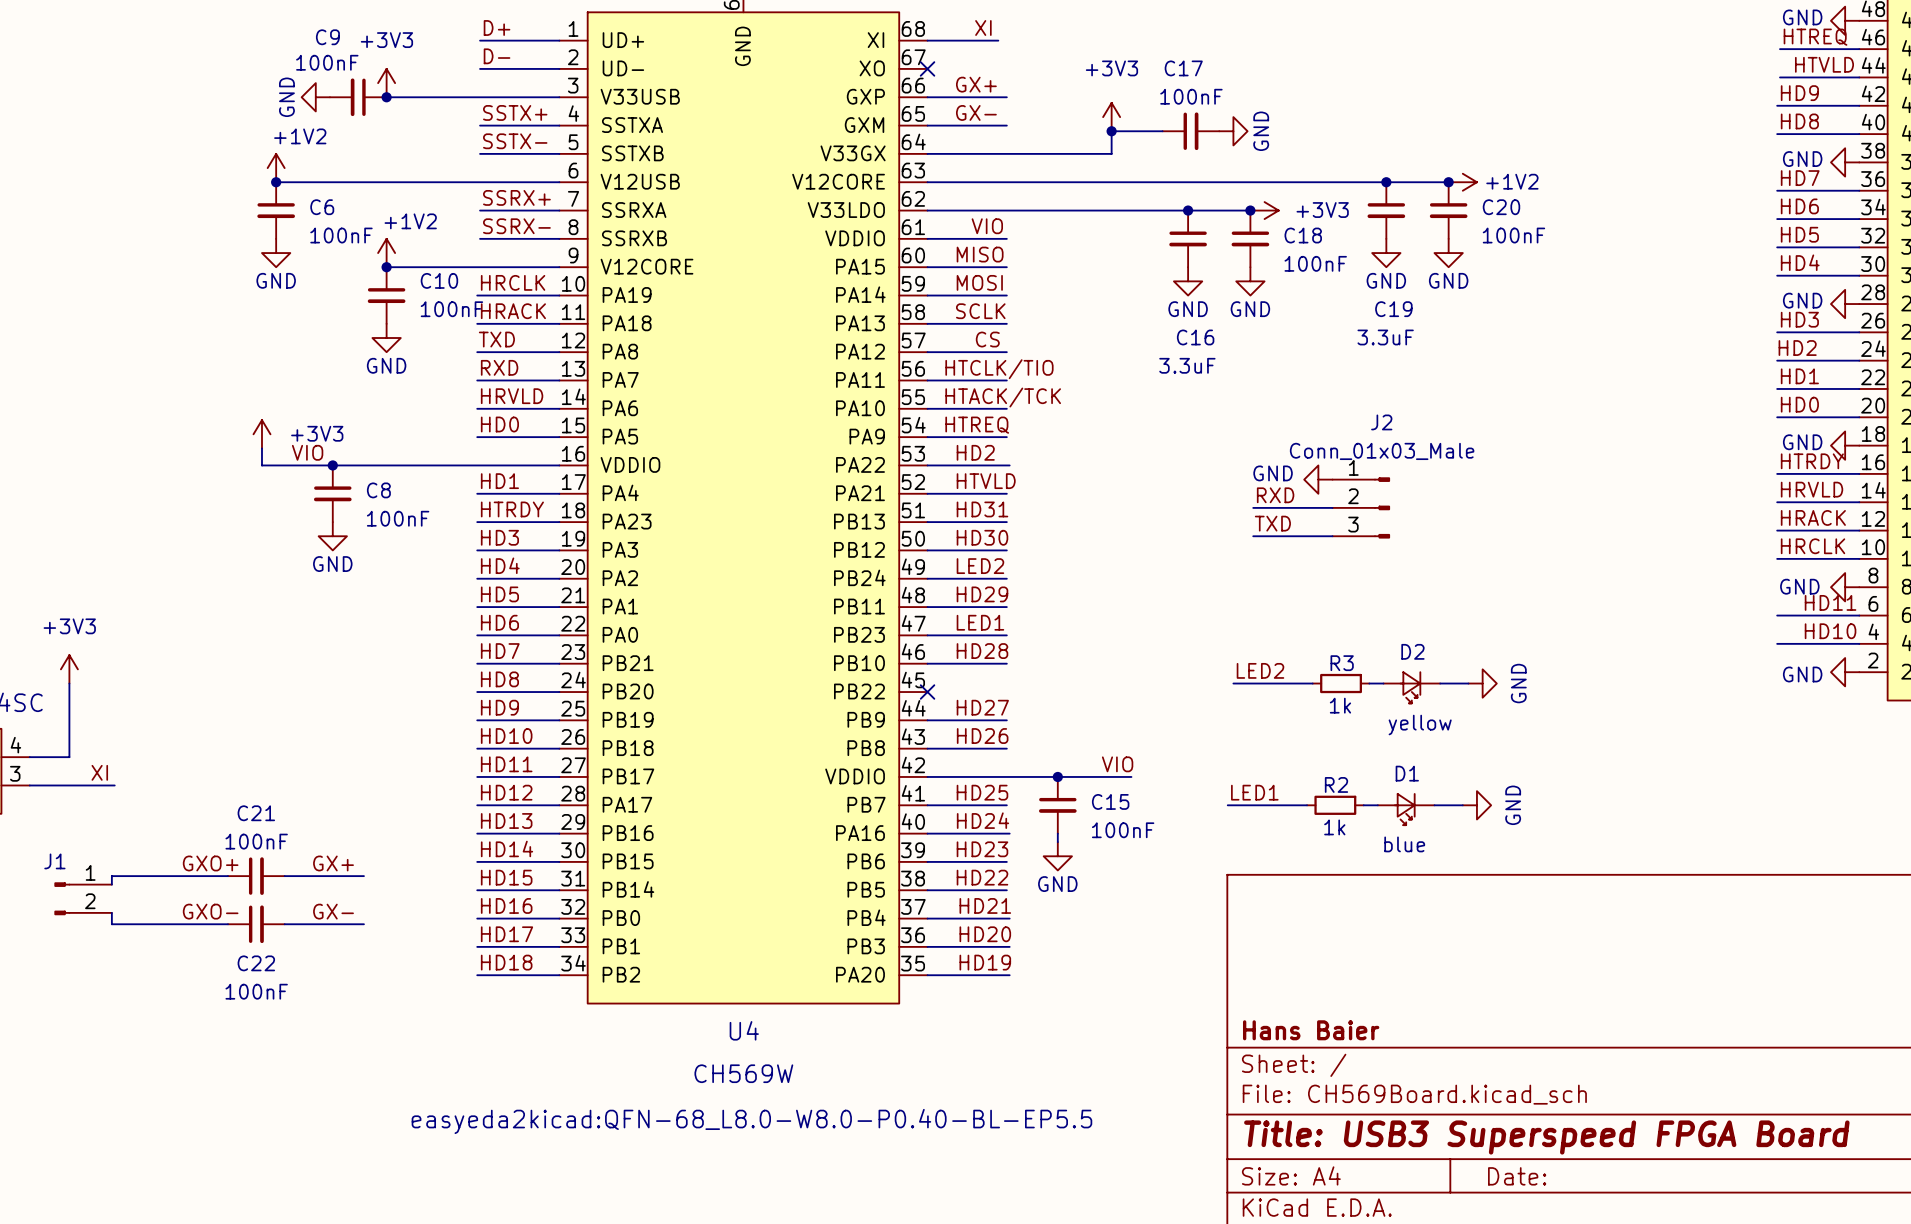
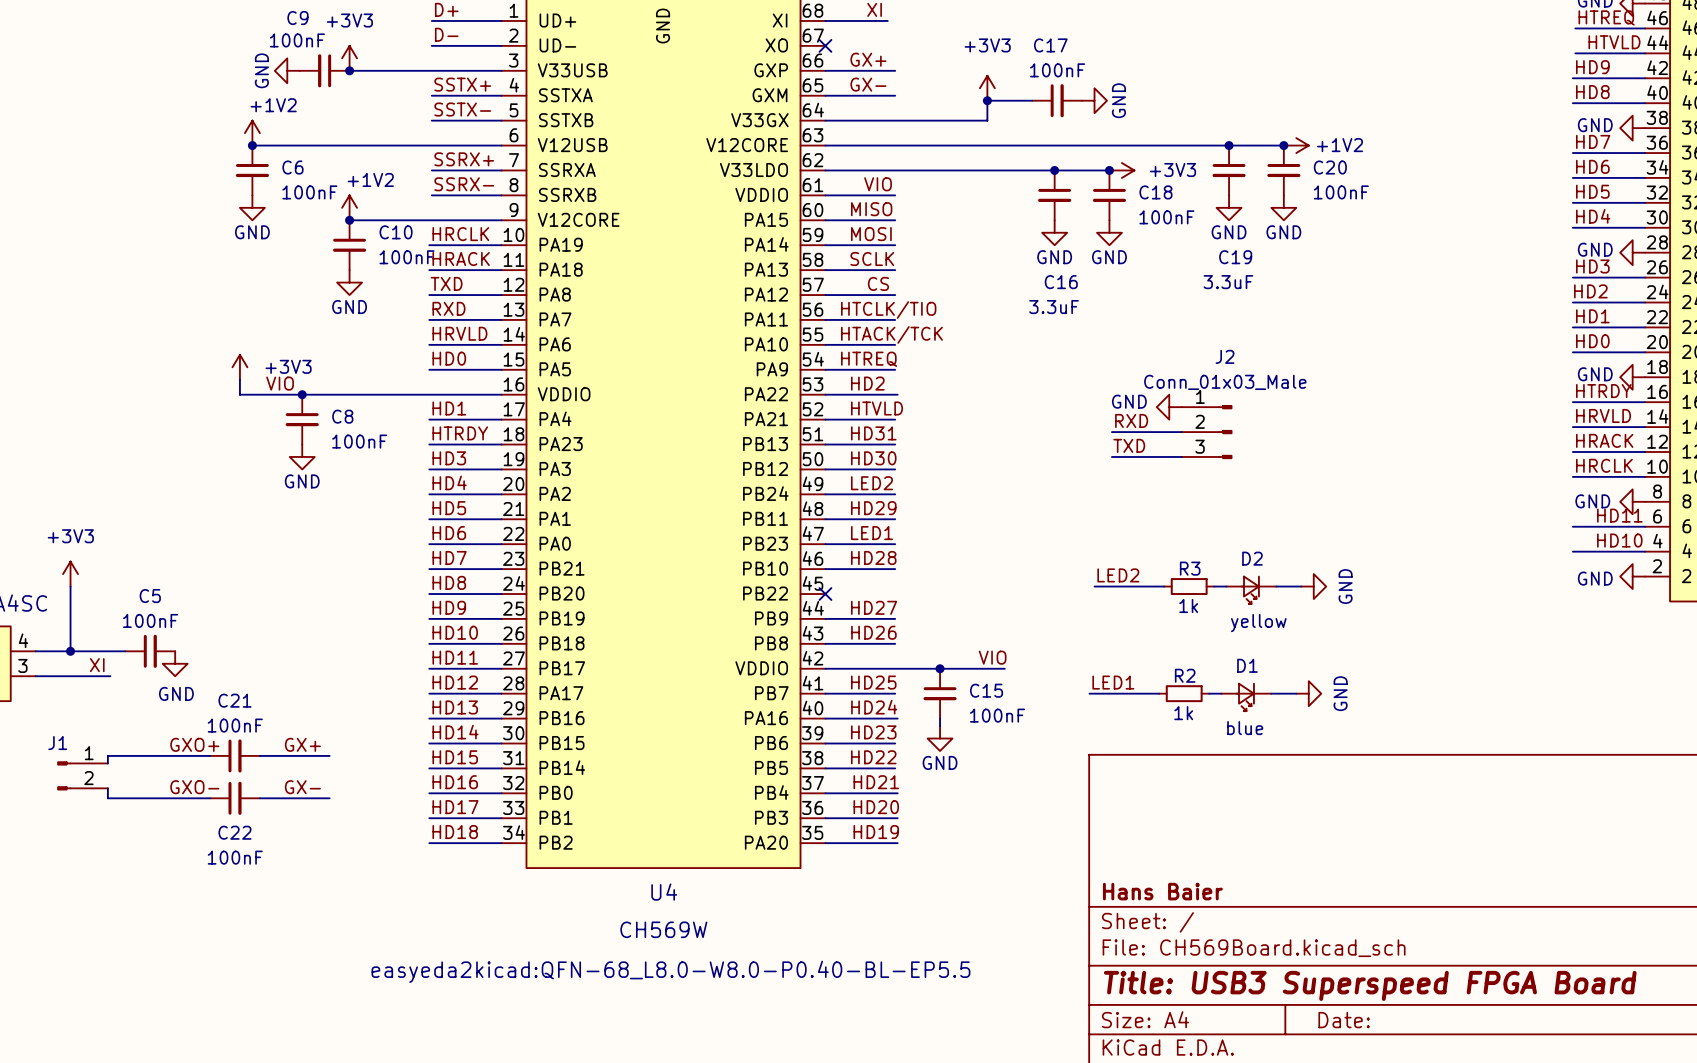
wire: none -> (70, 651) (125, 651)
junction: none -> (70, 651)
C5: none -> 100nF (150, 651)
power symbol: none -> GND (175, 663)

